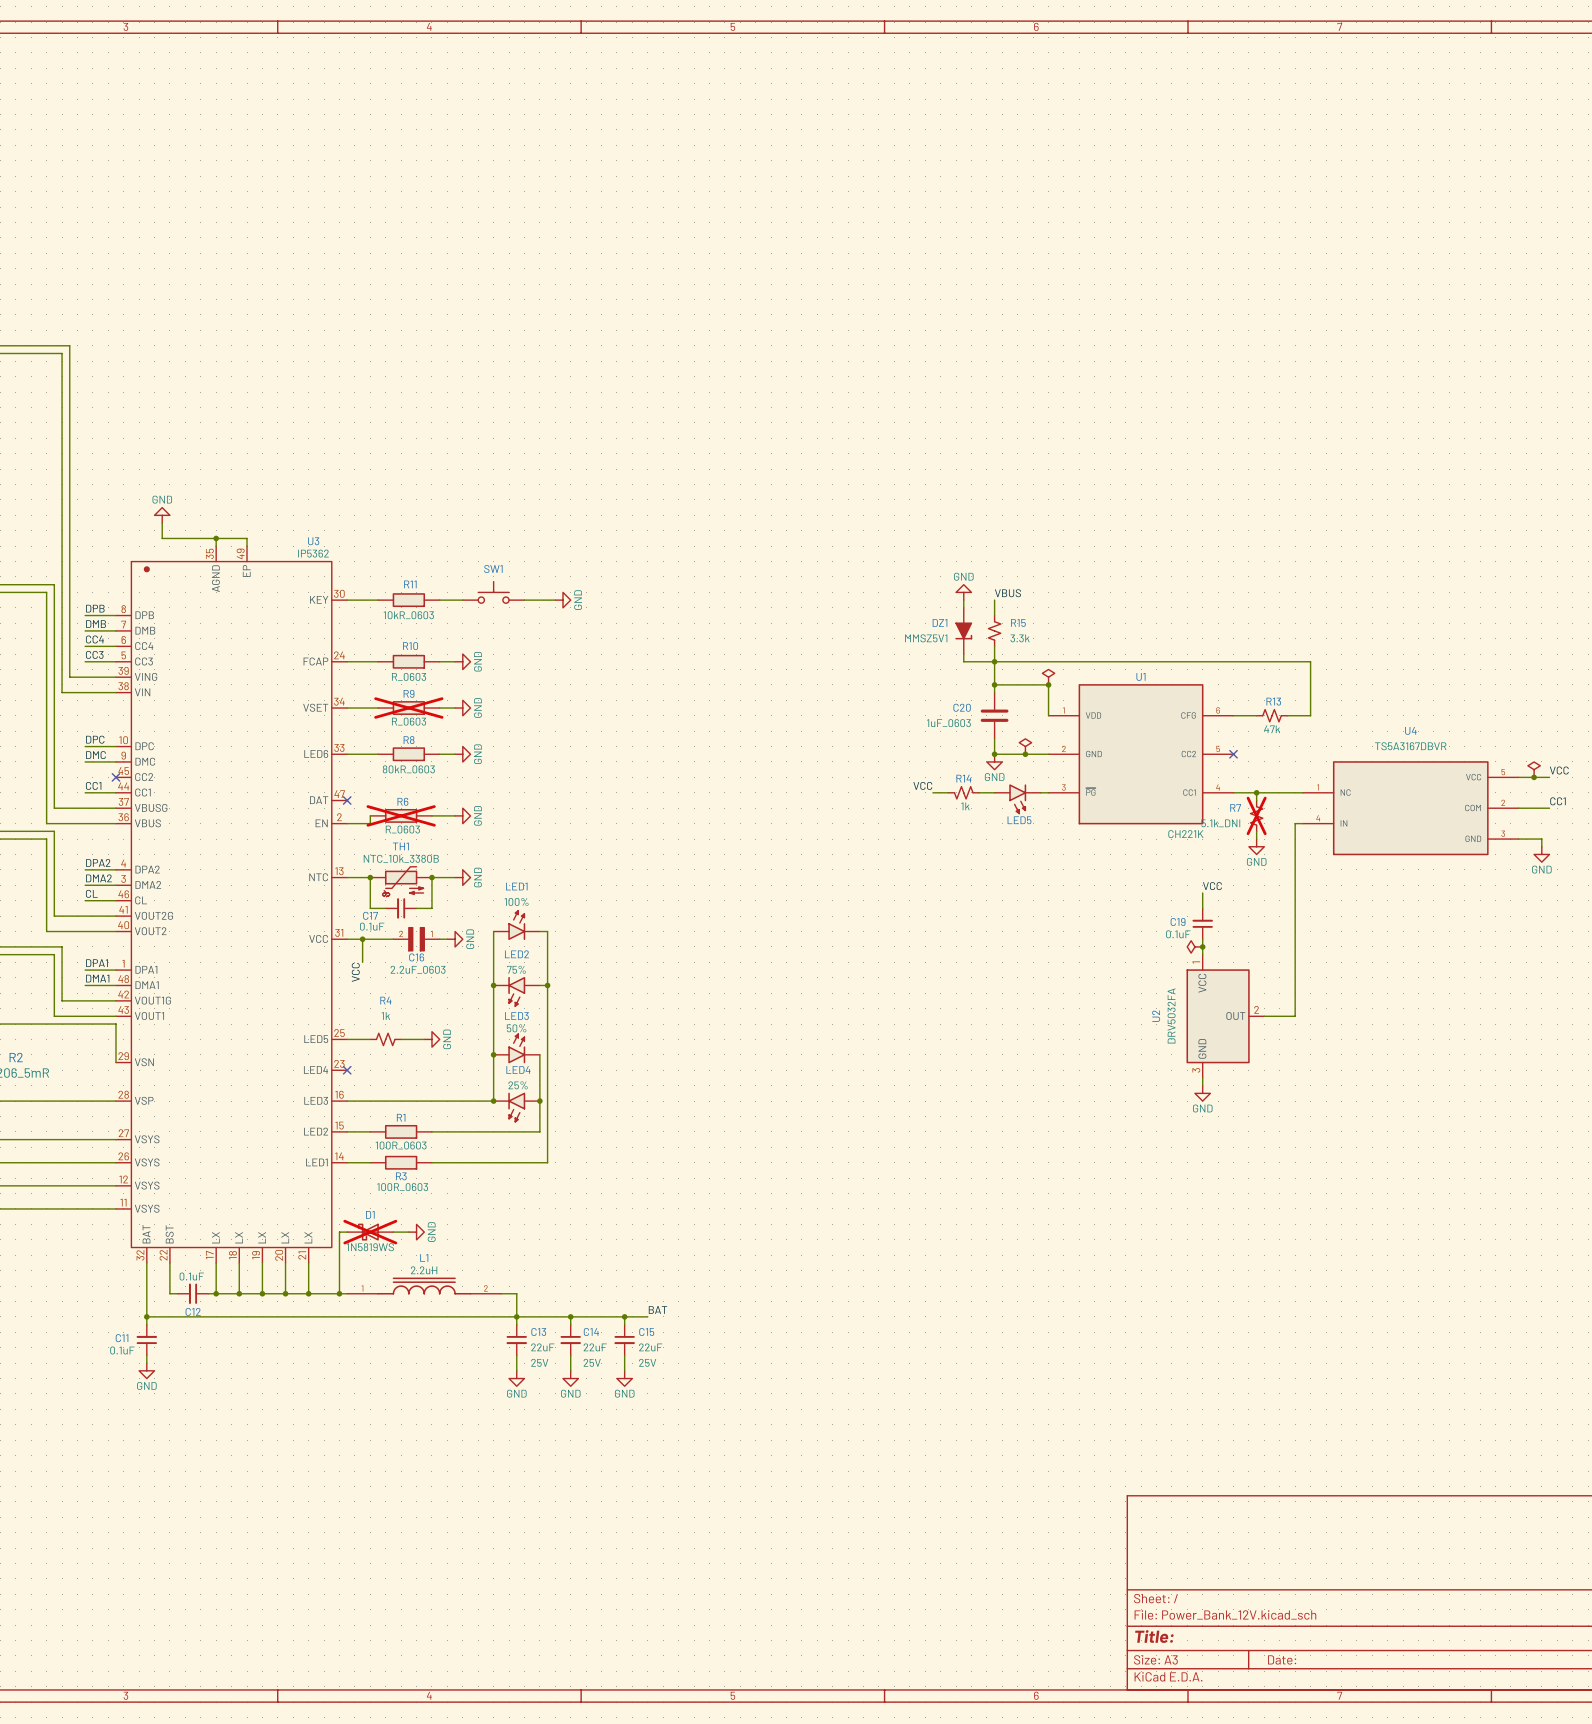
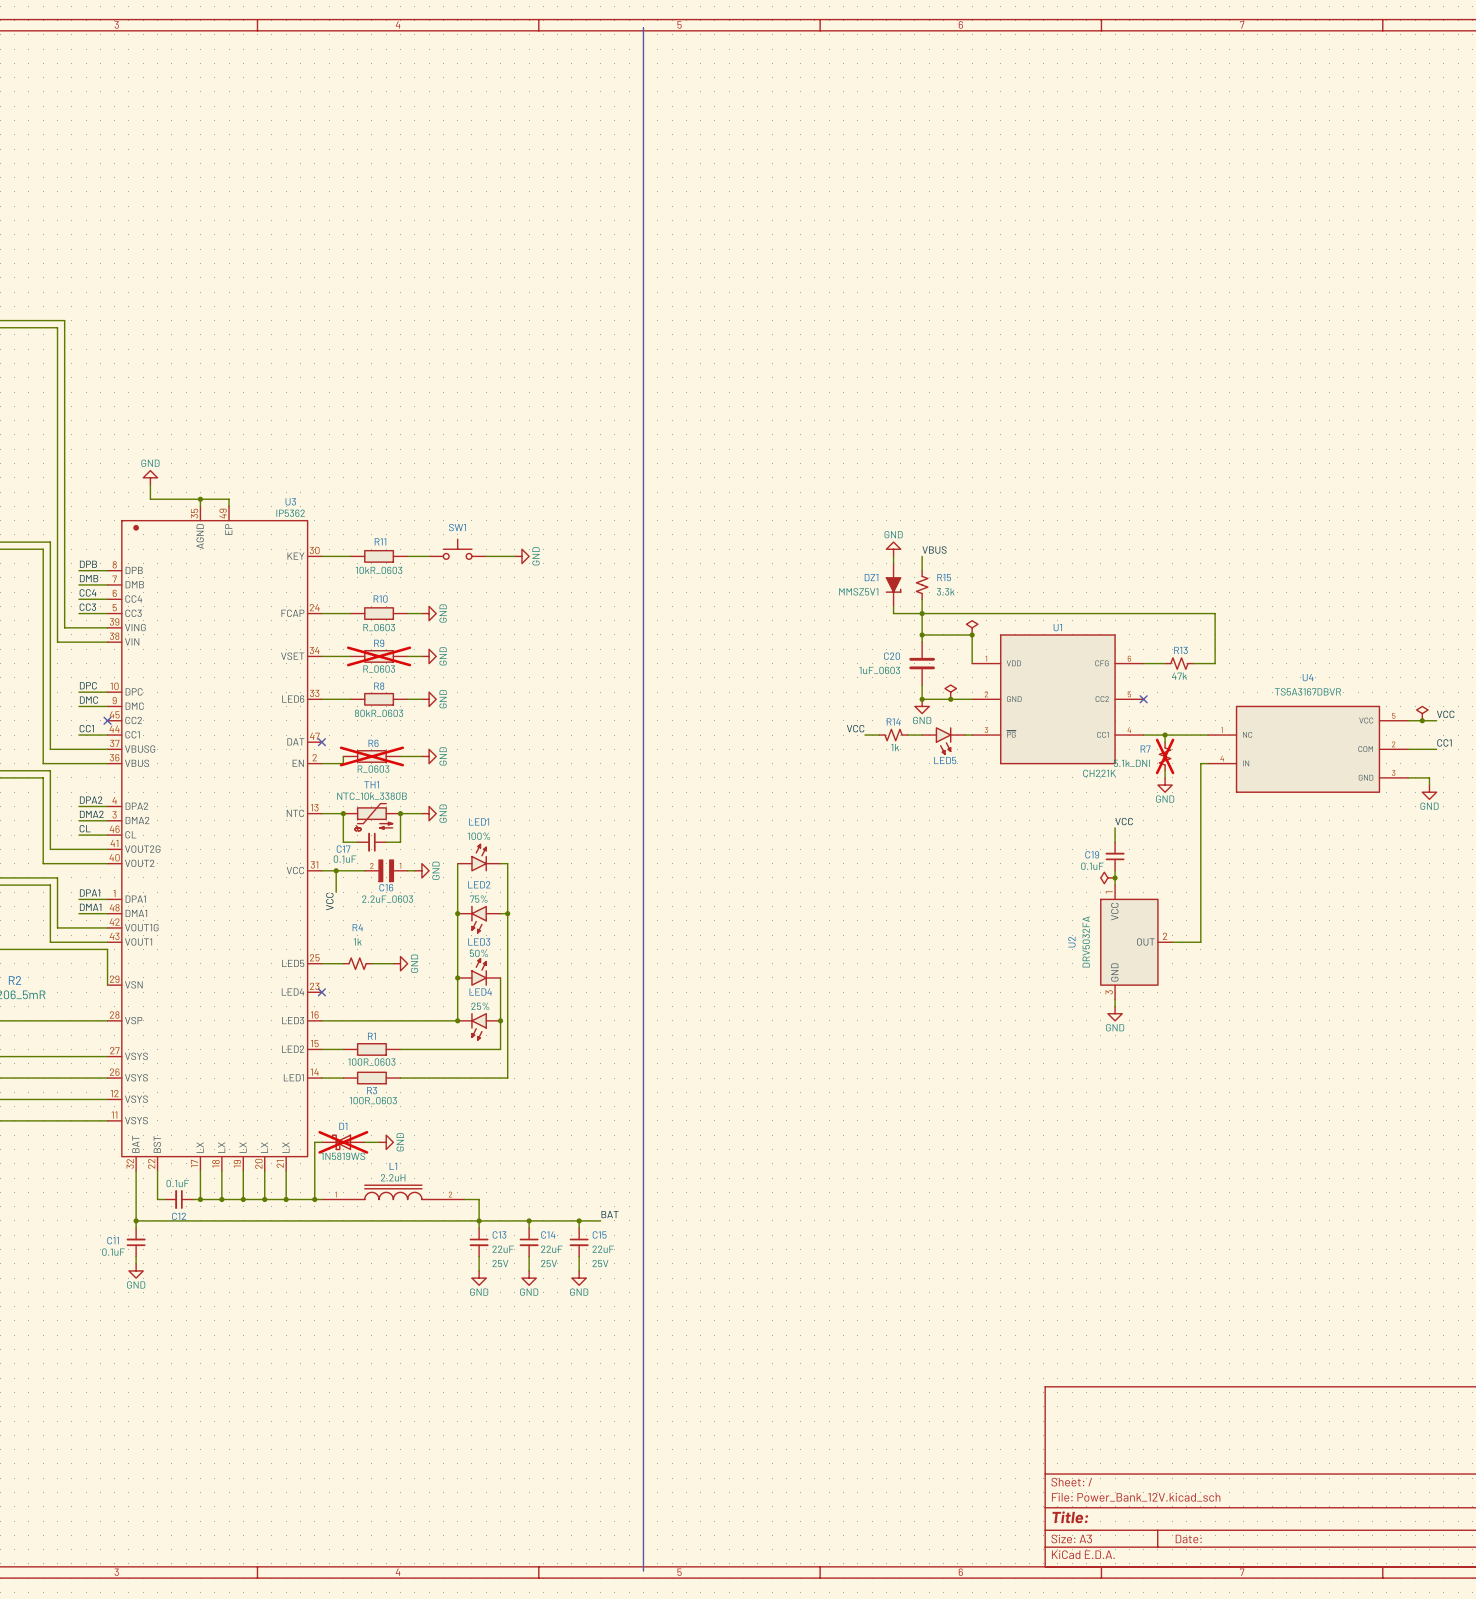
line: none -> (643, 27) (643, 1571)

